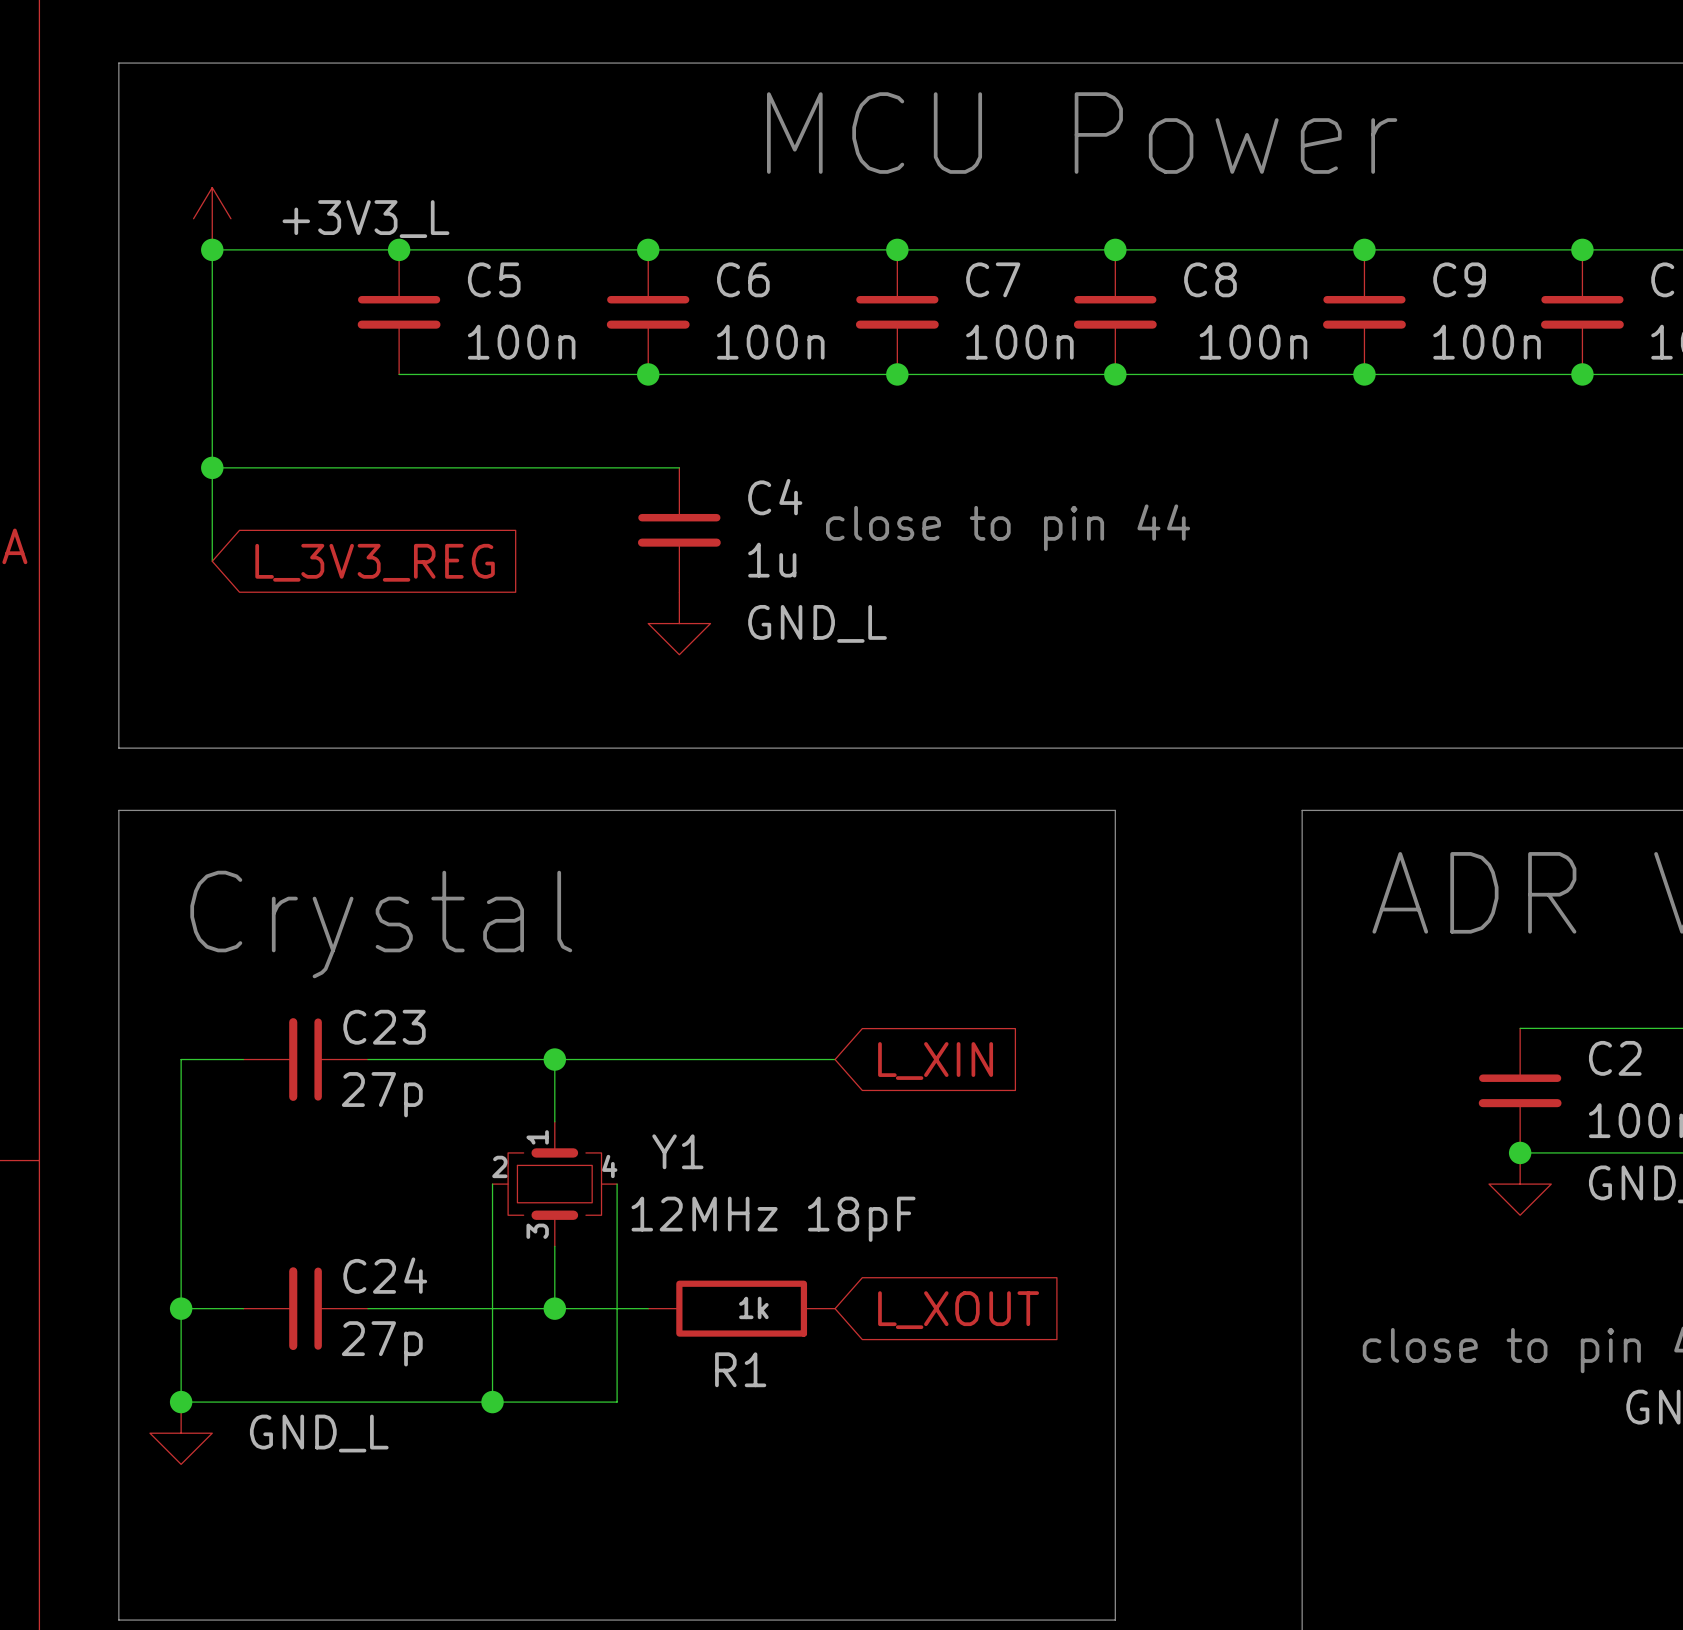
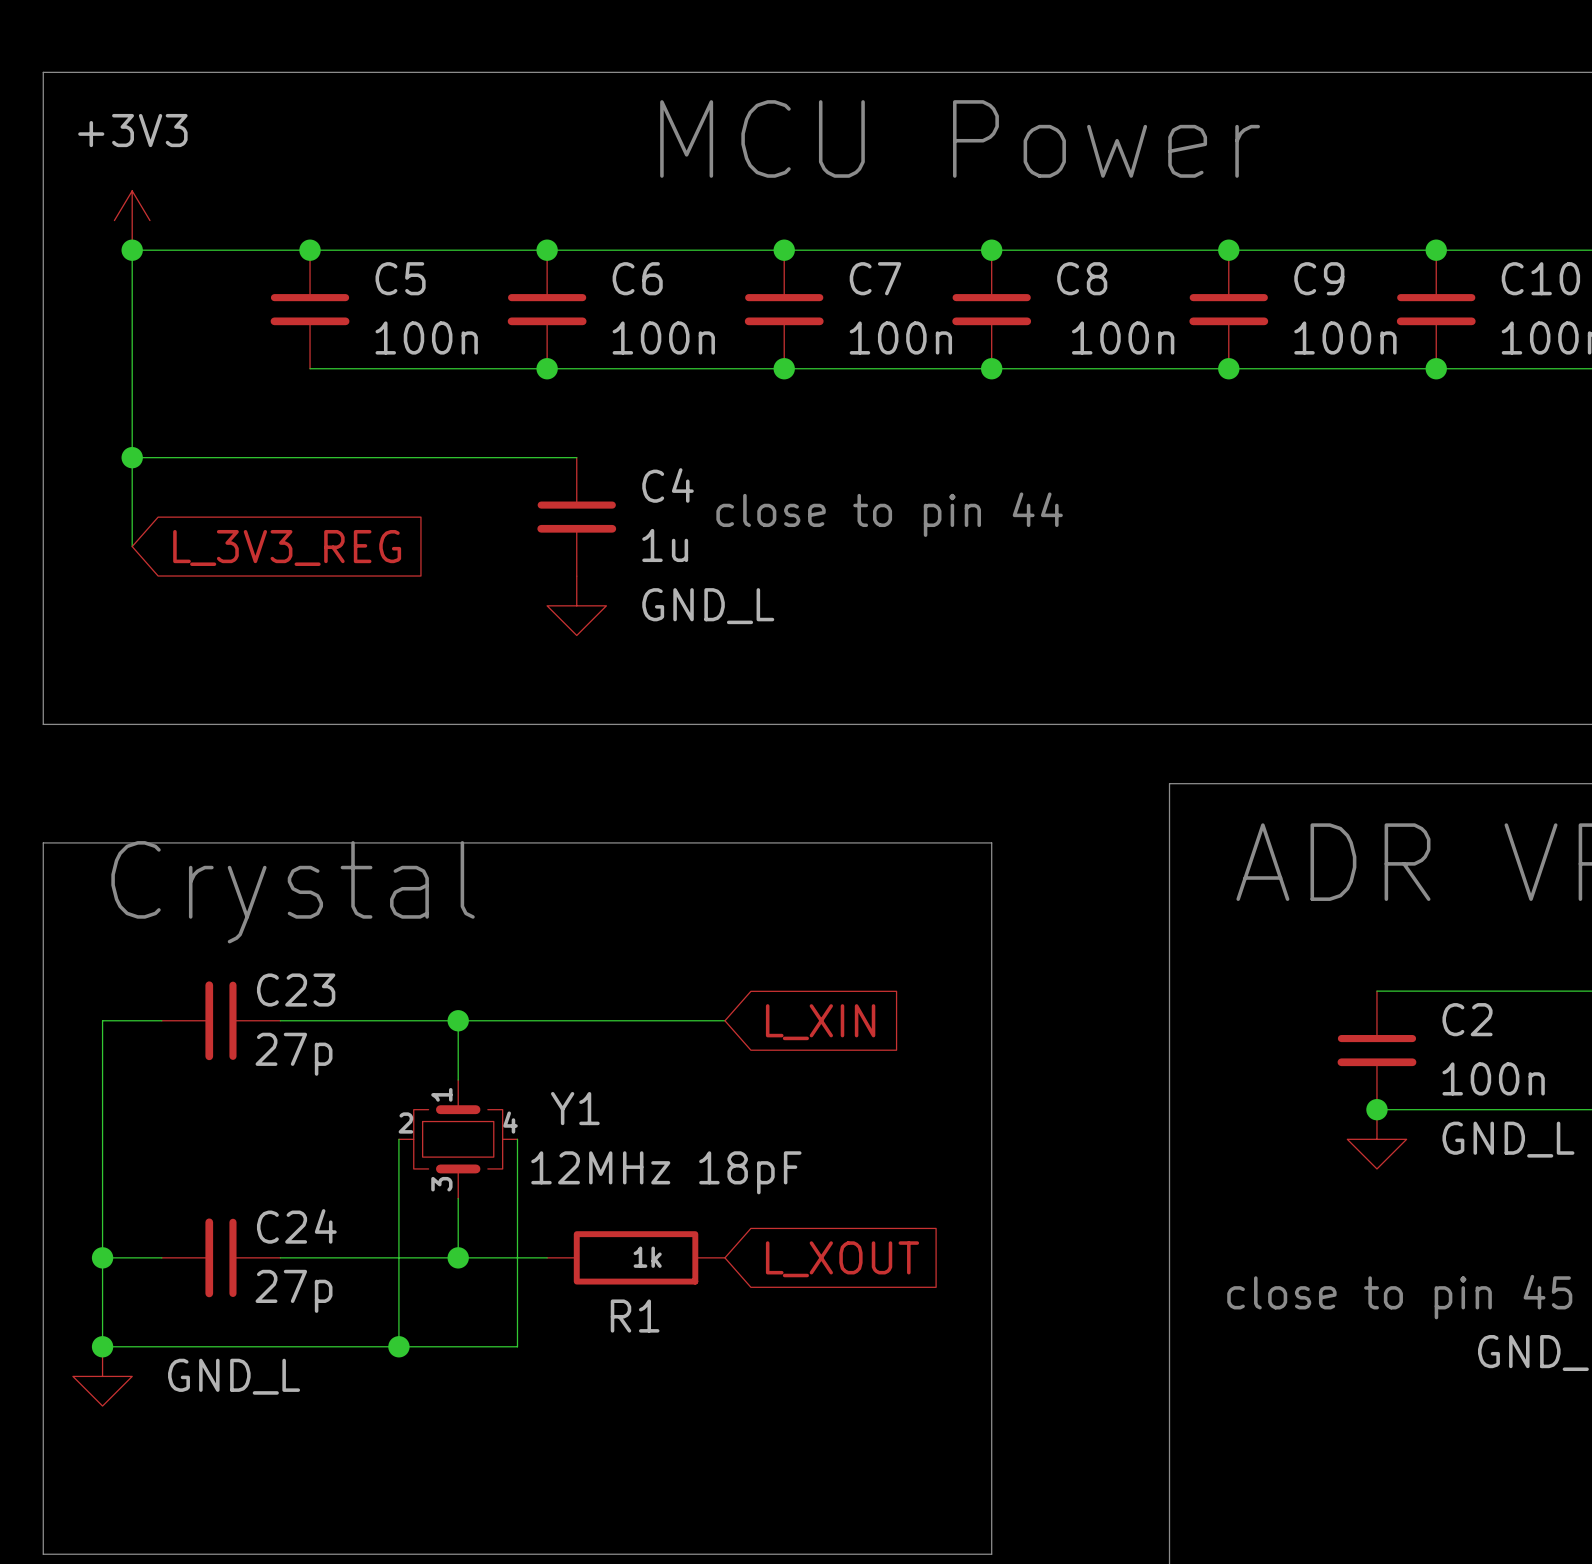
power symbol: +3V3_L (212, 218) -> +3V3 (132, 220)
line: (118, 872) (118, 810) (1115, 810) (1115, 872) -> (43, 842) (991, 842)

